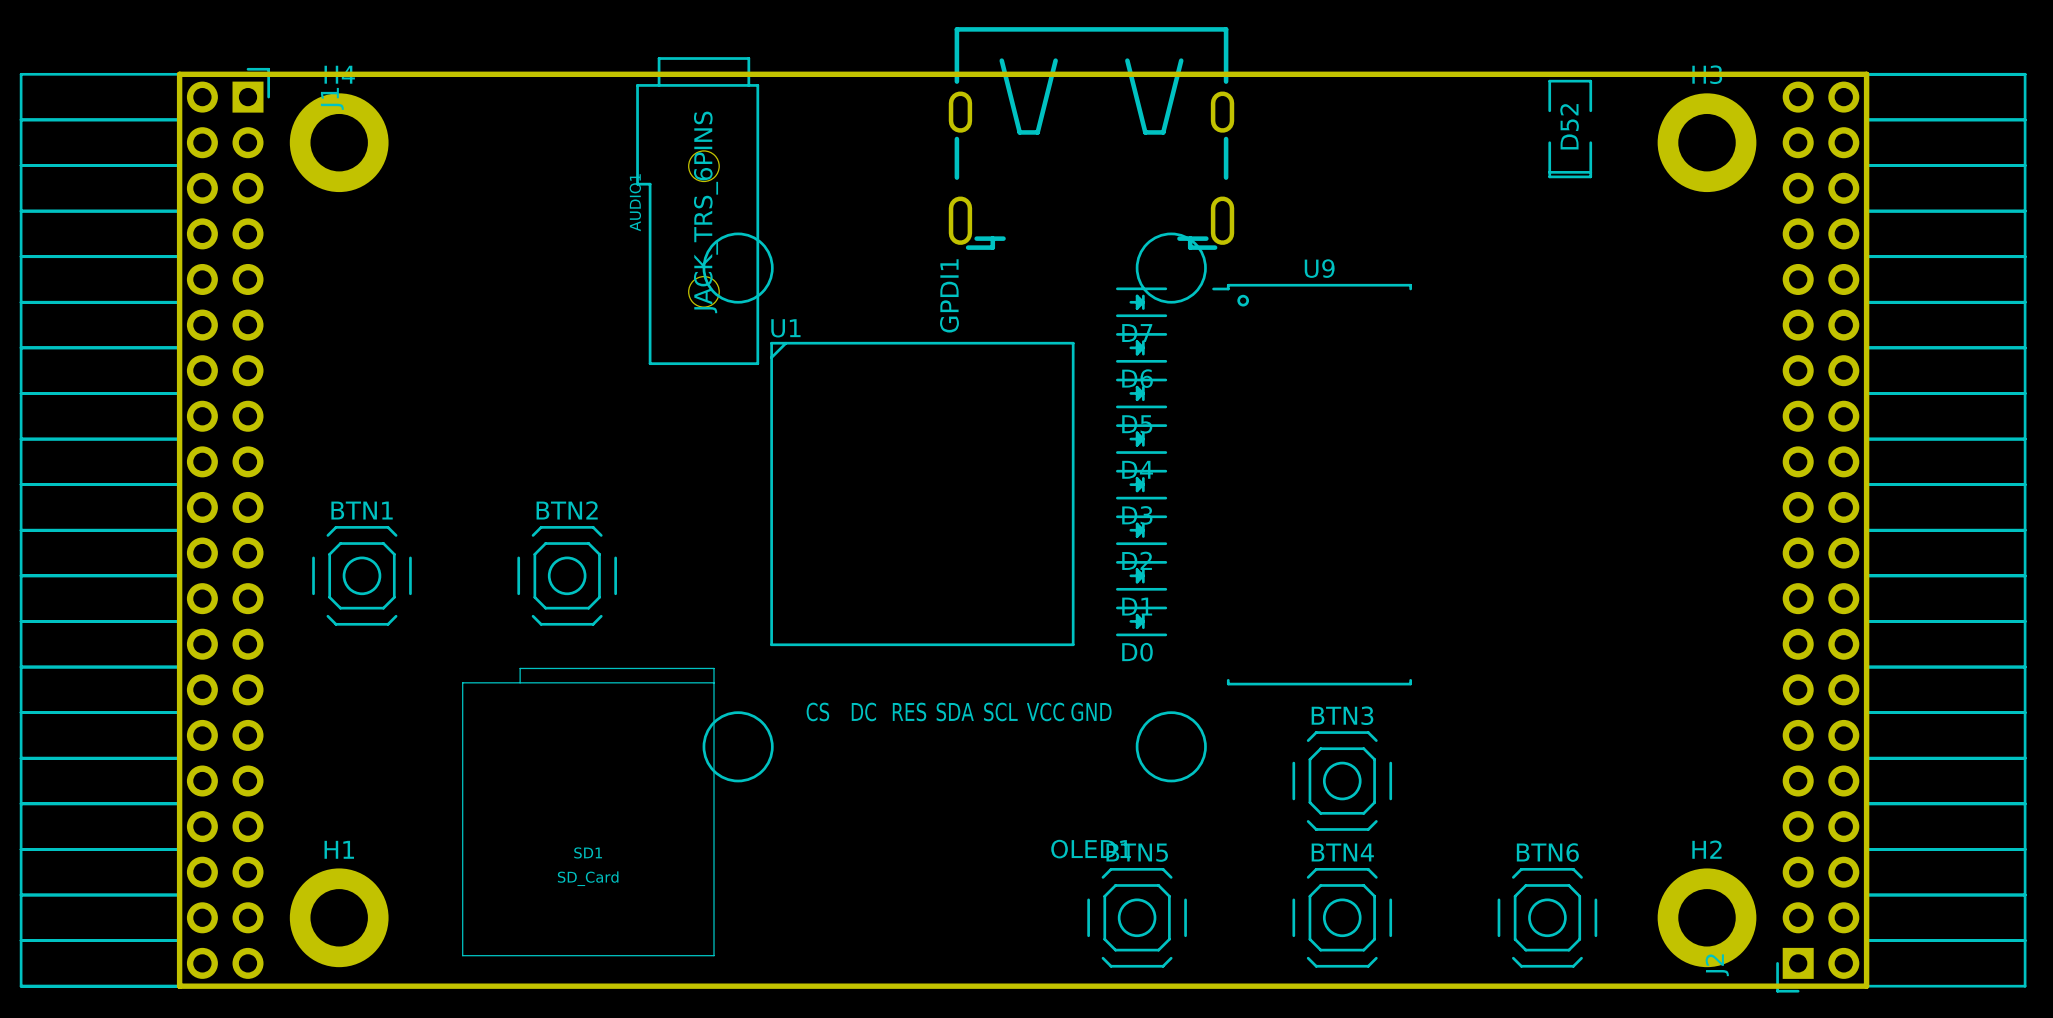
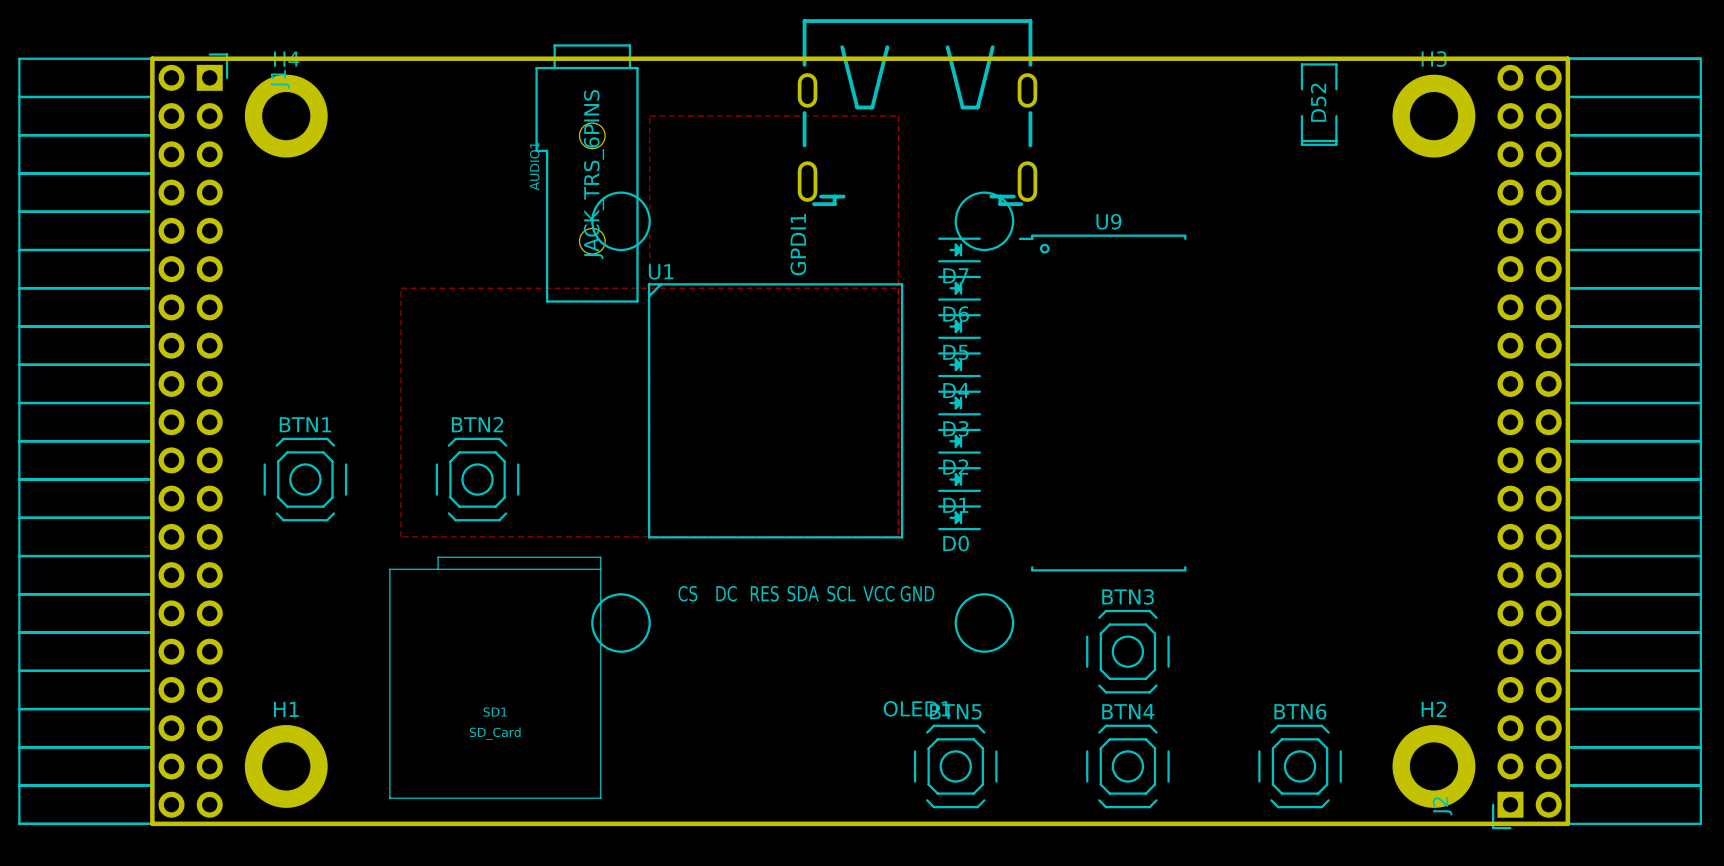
zone outline: none -> (898, 288) (401, 288) (401, 536) (898, 536) (898, 116) (649, 116) (649, 536)

